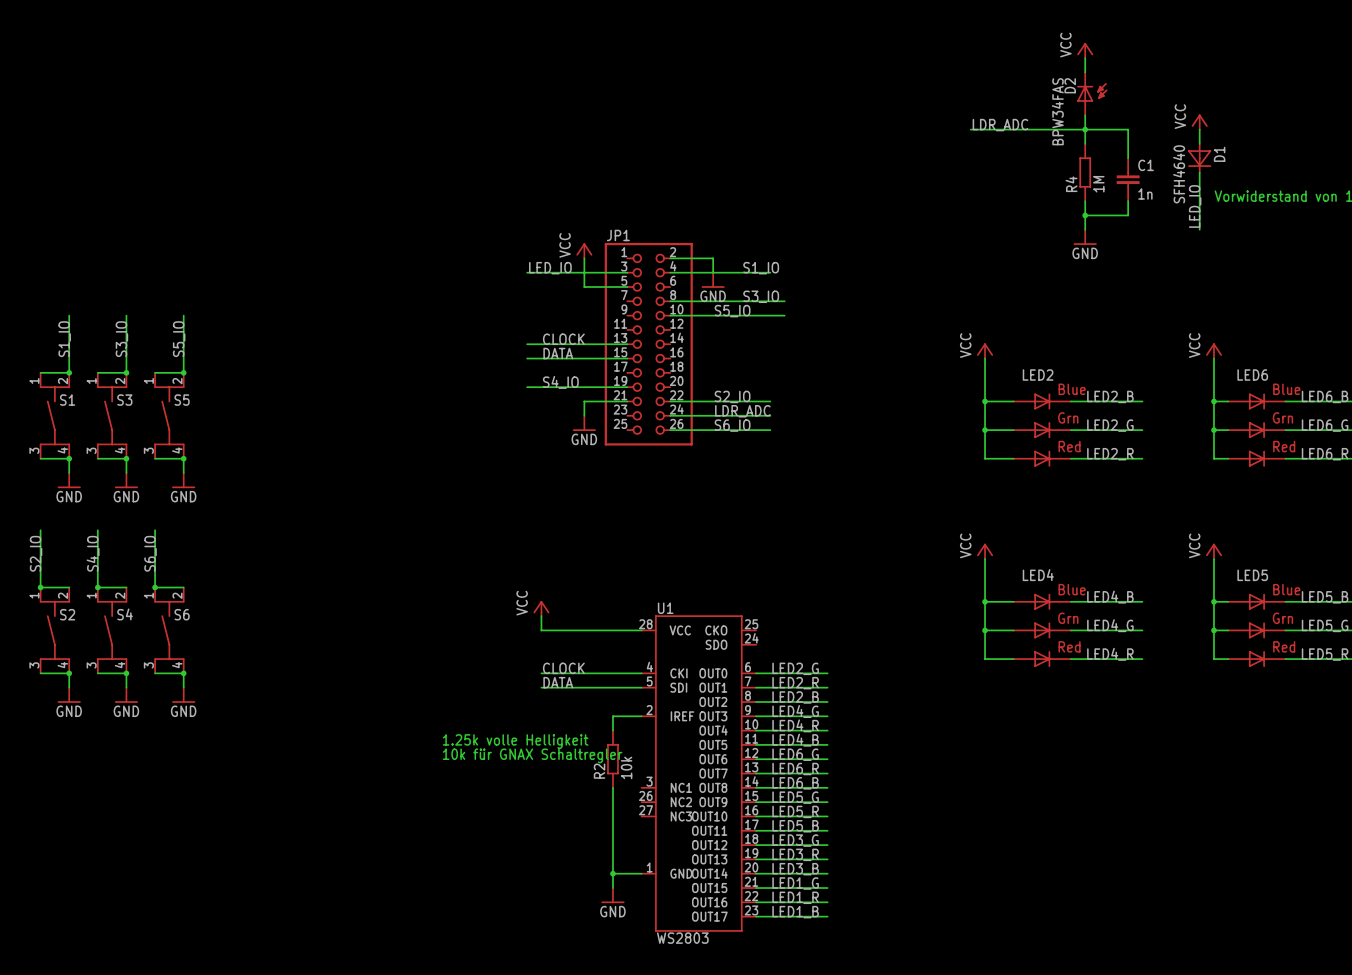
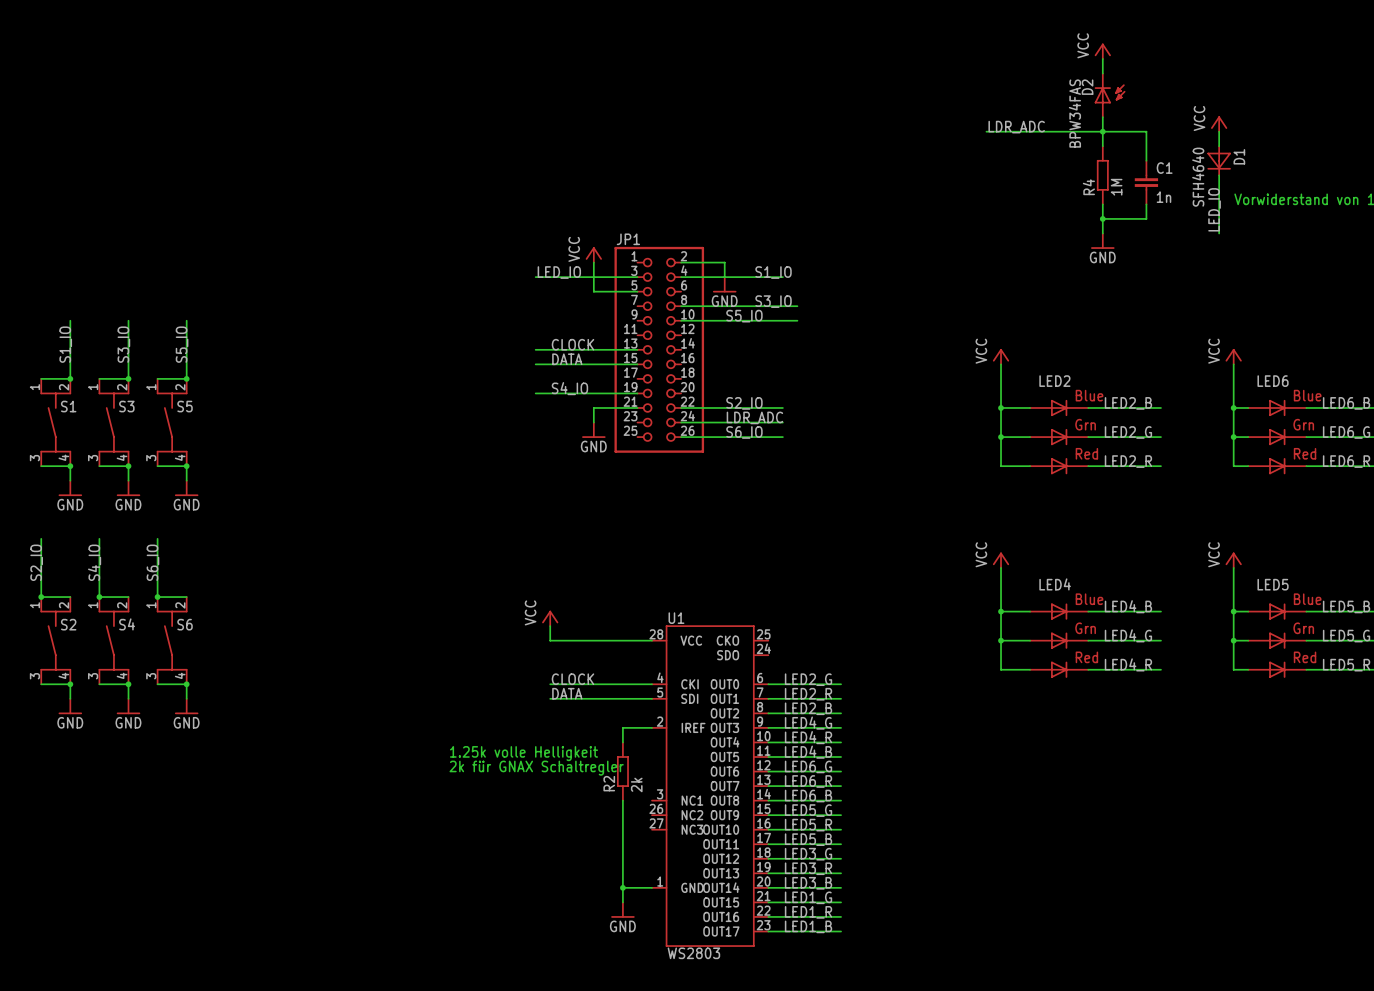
text: 10k für GNAX Schaltregler (532, 755) -> 2k für GNAX Schaltregler (536, 768)
R2 value: 10k (626, 767) -> 2k (636, 784)

